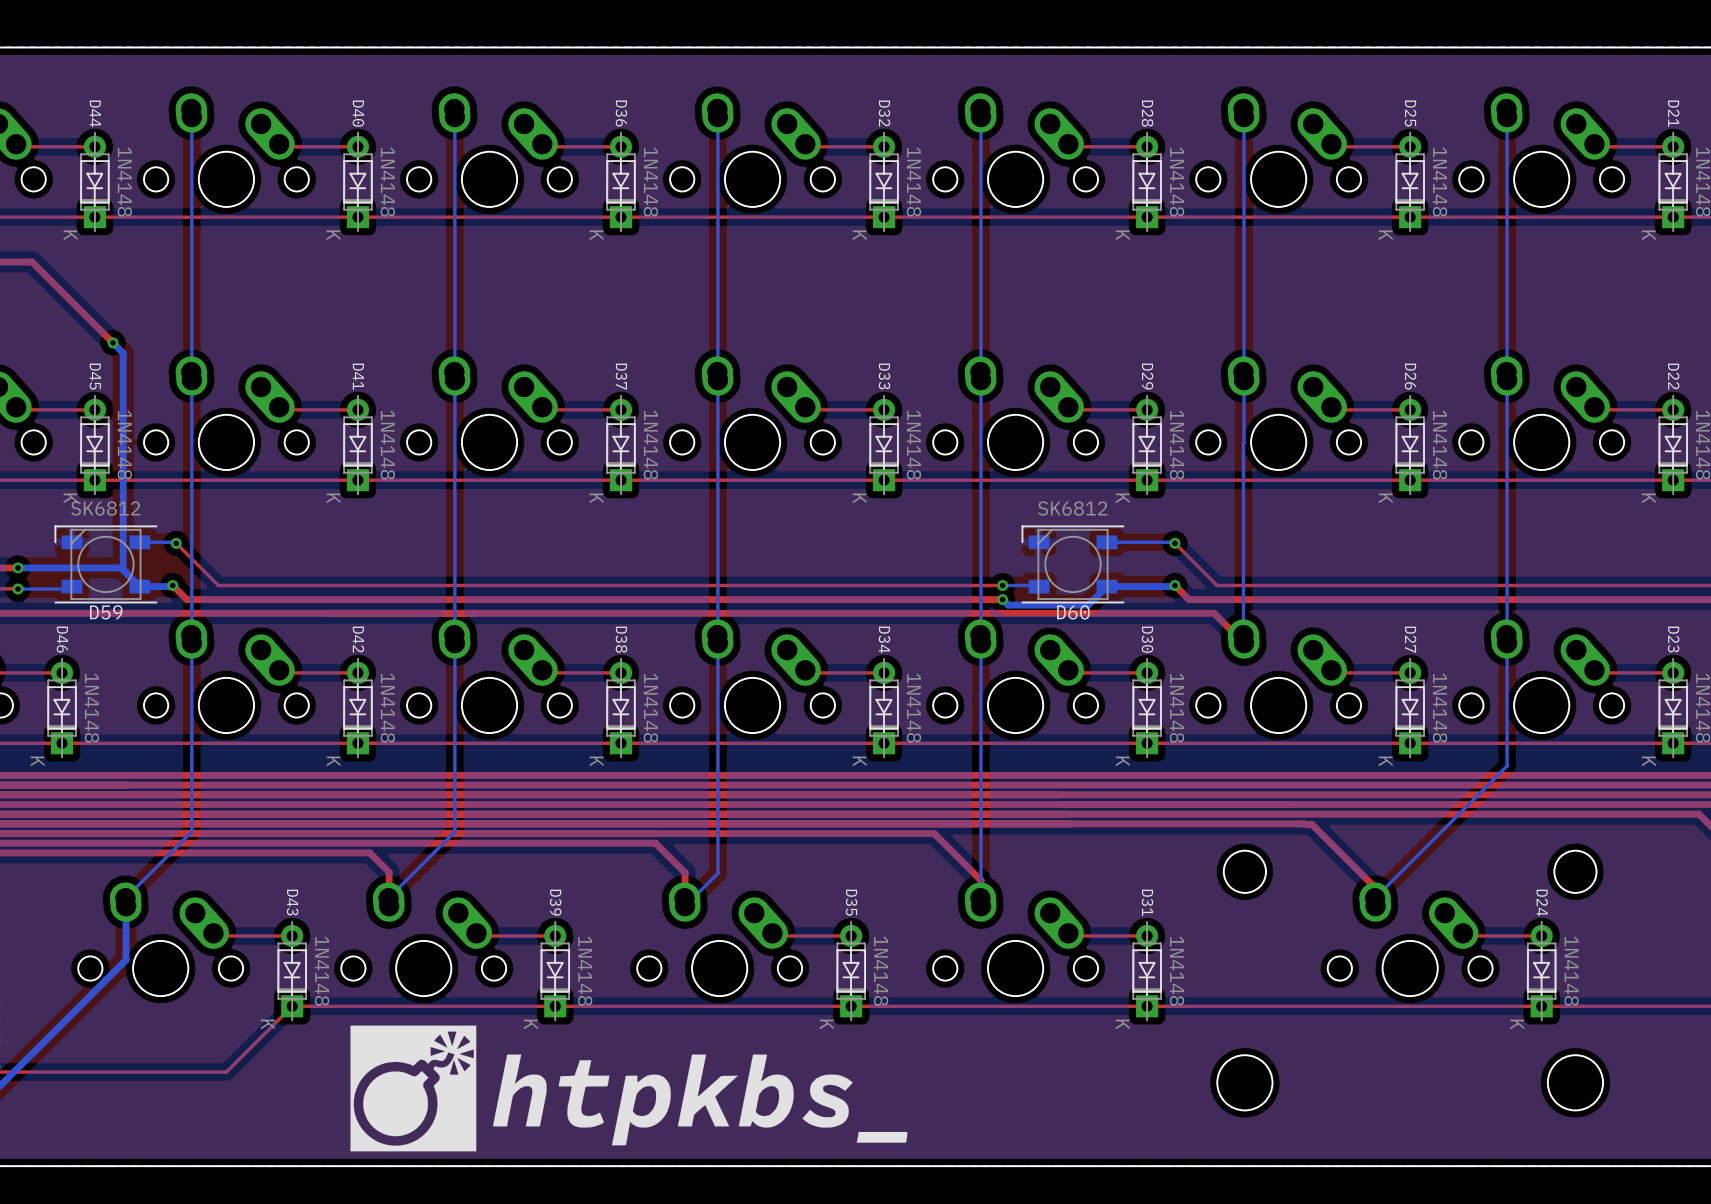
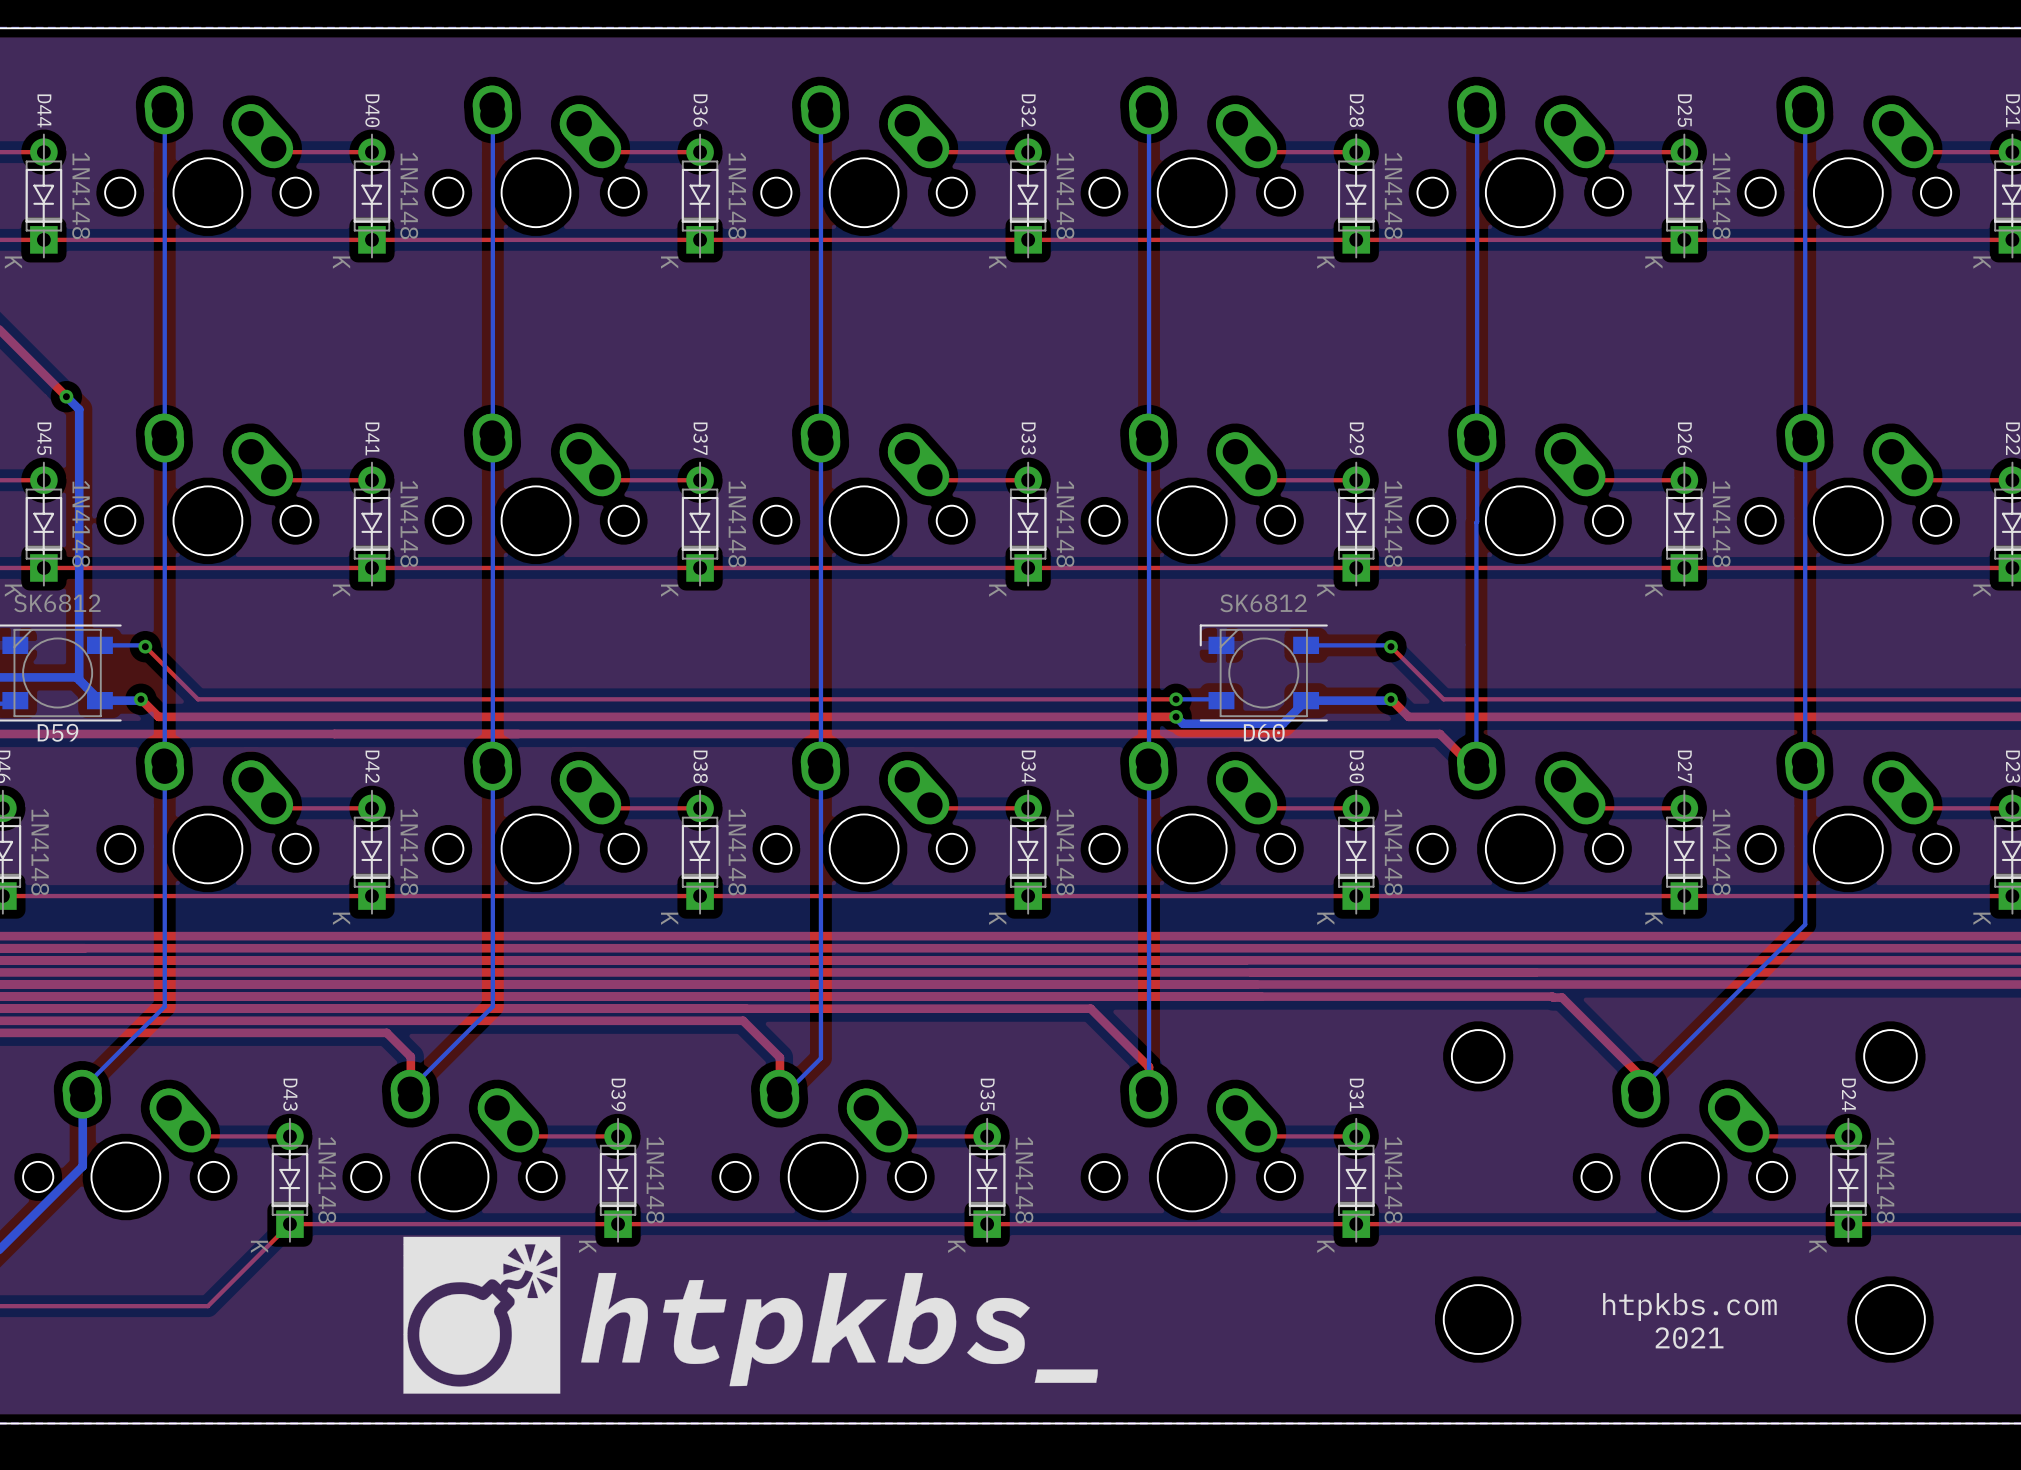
text: none -> htpkbs.com (1689, 1307)
drawing position: (628, 1088) -> (750, 1315)
text: none -> 2021 (1689, 1338)

